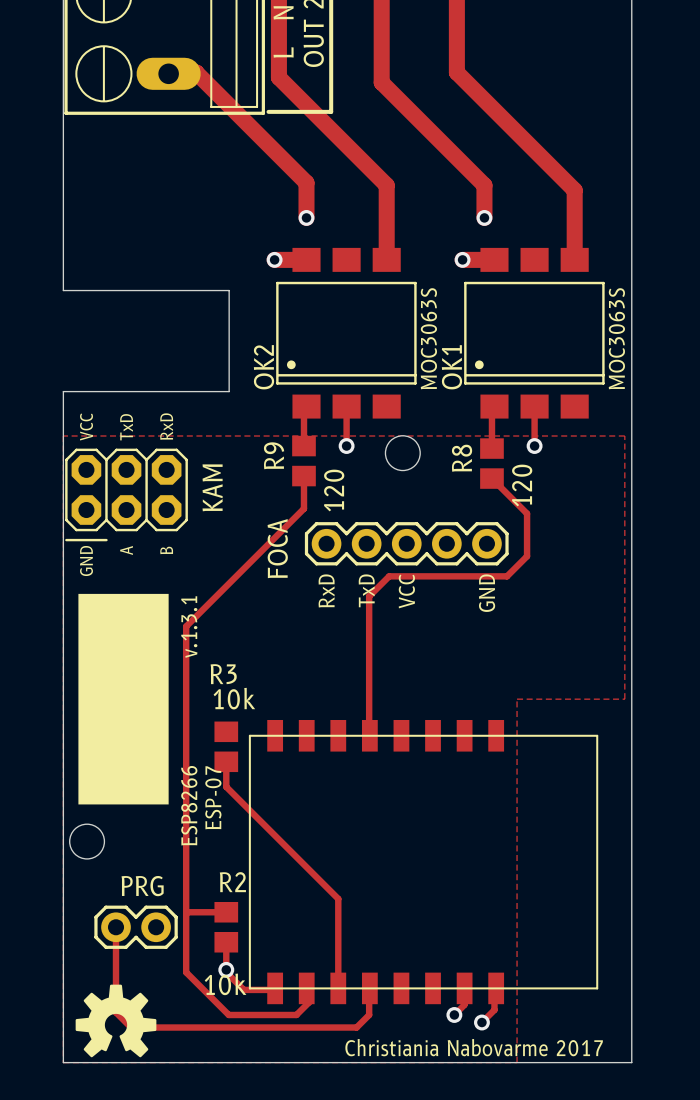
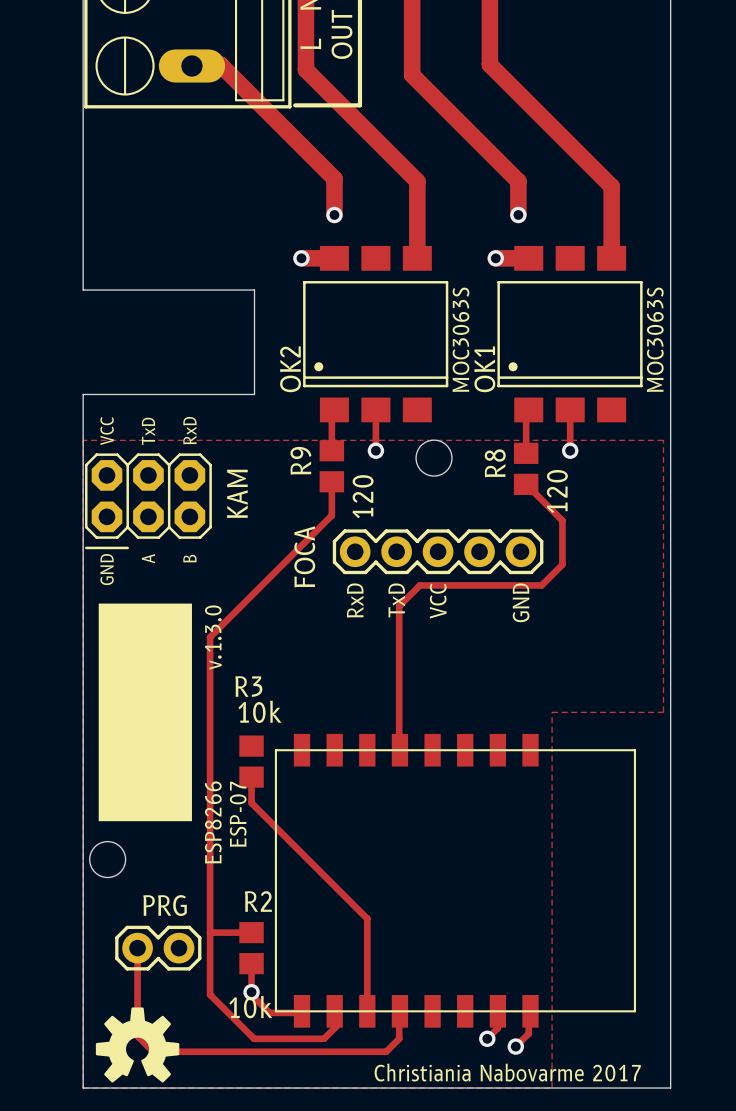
text: v.1.3.1 (189, 627) -> v.1.3.0 (213, 637)

